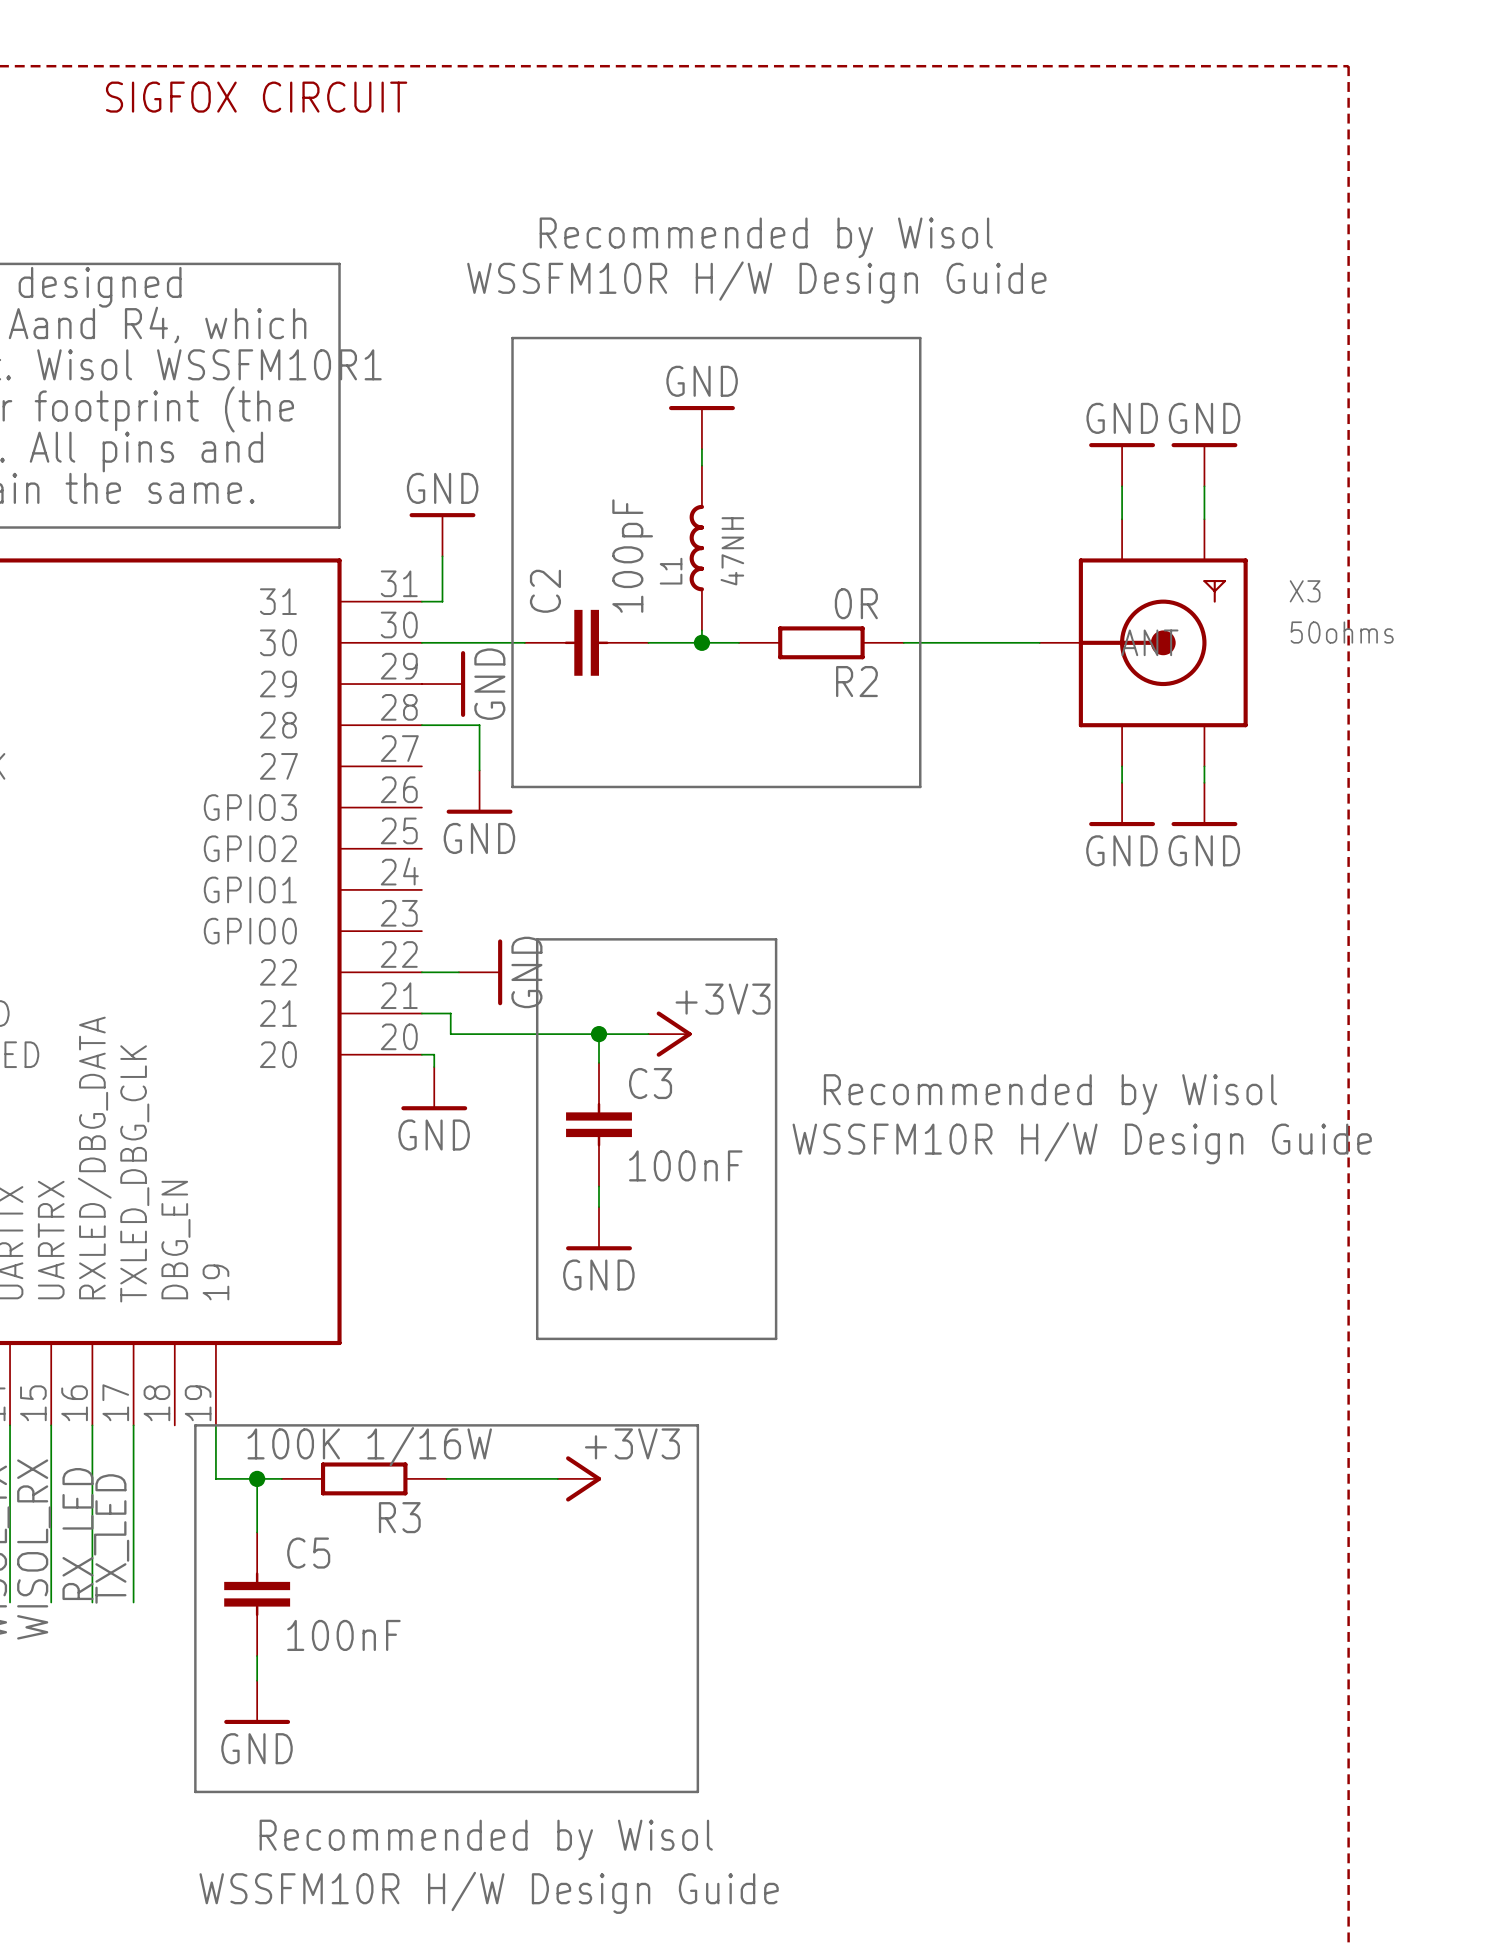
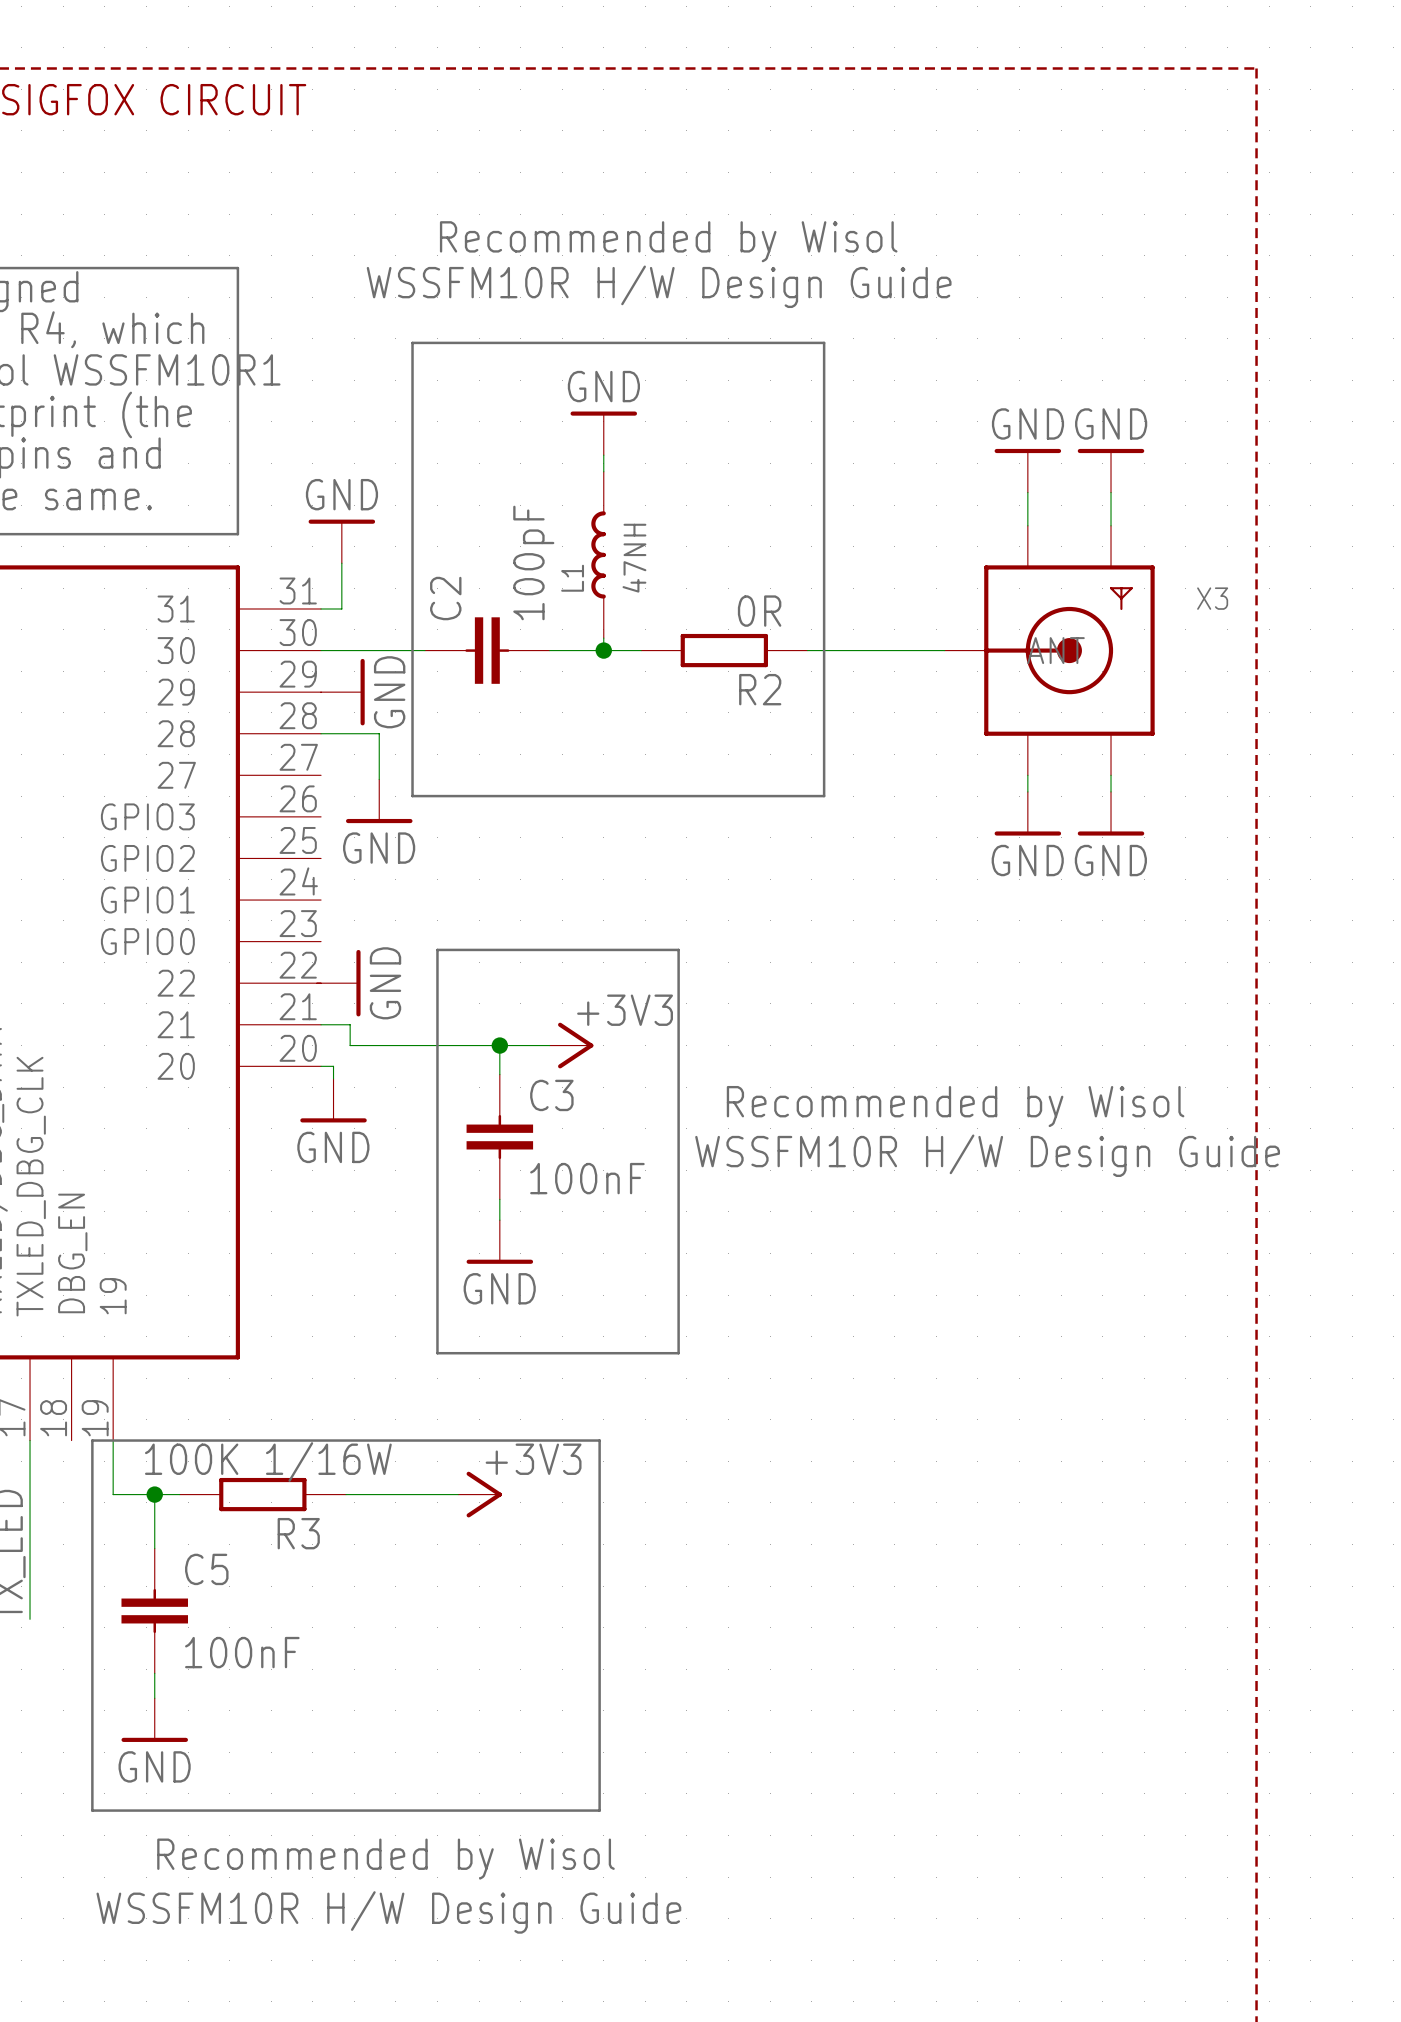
X3 value: 50ohms (1342, 632) -> none
power symbol position: GND (480, 972) -> GND (338, 983)

